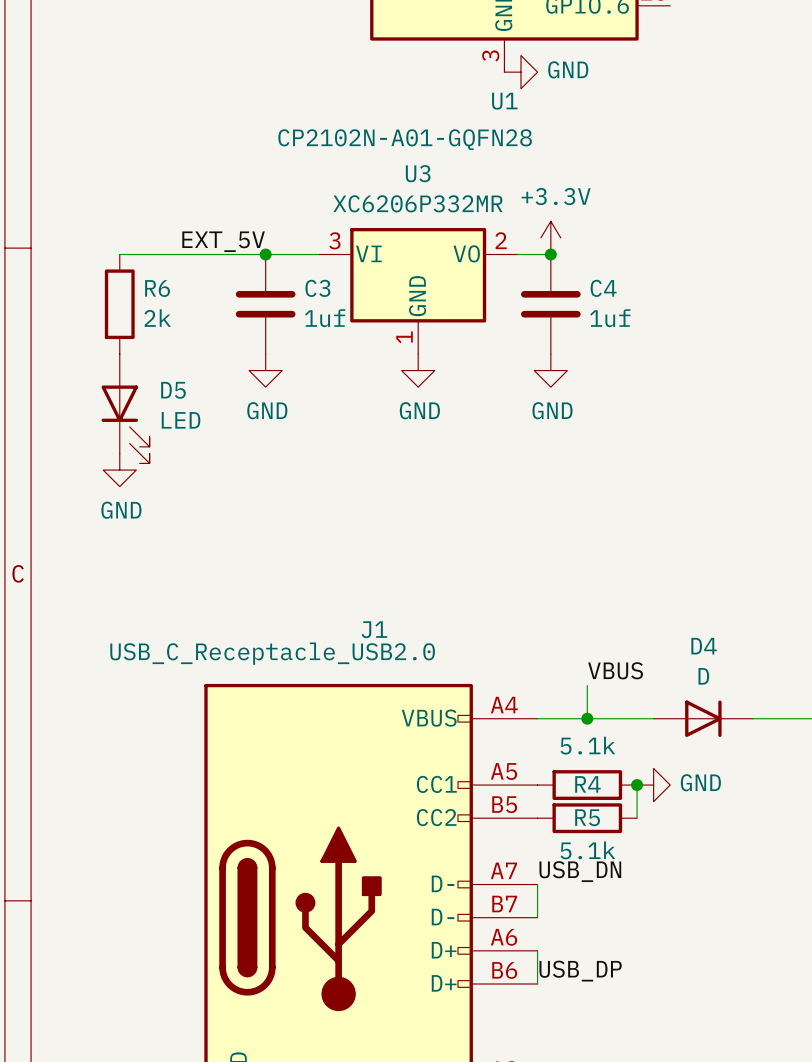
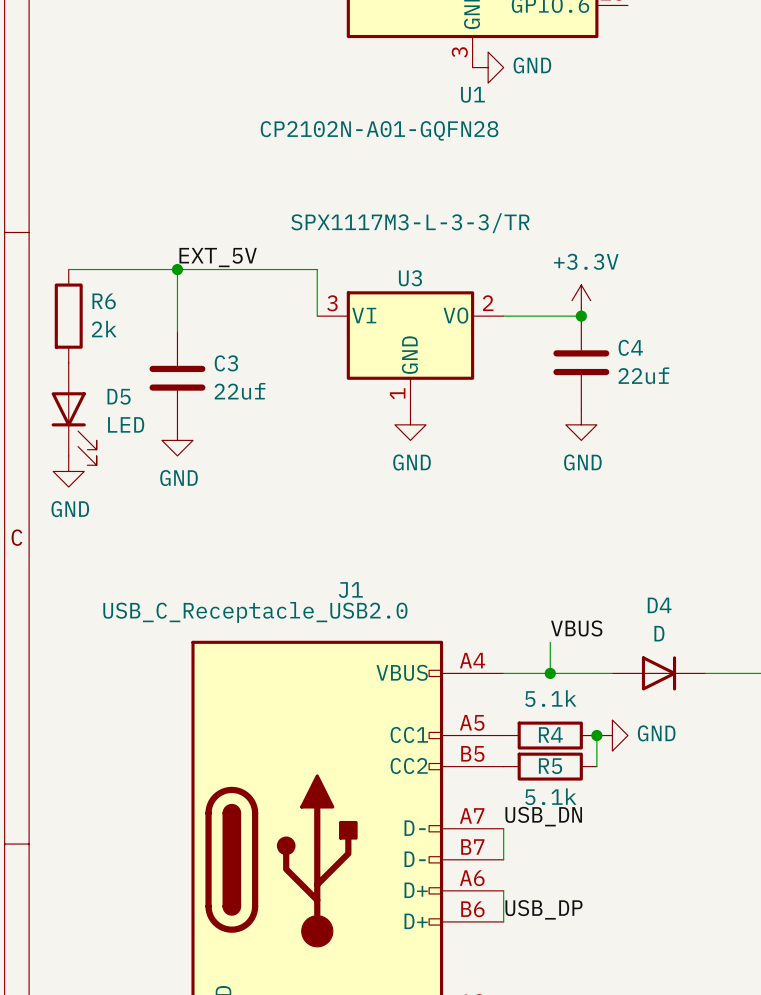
U3 name position: U3 (418, 173) -> U3 (410, 278)
U3 value: XC6206P332MR (417, 203) -> SPX1117M3-L-3-3/TR (410, 223)
power symbol position: +3.3V (550, 237) -> +3.3V (581, 300)
label position: EXT_5V (223, 241) -> EXT_5V (218, 257)
wire: (119, 254) (318, 254) -> none
junction: (265, 254) -> none
wire: (517, 254) (550, 254) -> none
junction: (550, 254) -> none
wire: none -> (68, 269) (317, 269) (317, 316)
wire: none -> (177, 269) (177, 331)
junction: none -> (177, 269)
U3 position: (418, 290) -> (410, 350)
R6 position: (119, 304) -> (68, 316)
C3 position: (265, 304) -> (177, 378)
C4 position: (550, 304) -> (581, 362)
C3 value: 1uf (325, 318) -> 22uf (240, 391)
C4 value: 1uf (610, 318) -> 22uf (643, 375)
wire: none -> (503, 316) (581, 316)
junction: none -> (581, 316)
power symbol: GND (265, 370) -> none
power symbol: GND (418, 370) -> none
power symbol: GND (550, 370) -> none
D5 position: (125, 408) -> (74, 413)
power symbol: none -> GND (410, 424)
power symbol: none -> GND (581, 424)
power symbol: GND (119, 470) -> none
power symbol: none -> GND (177, 440)
power symbol: none -> GND (68, 471)

